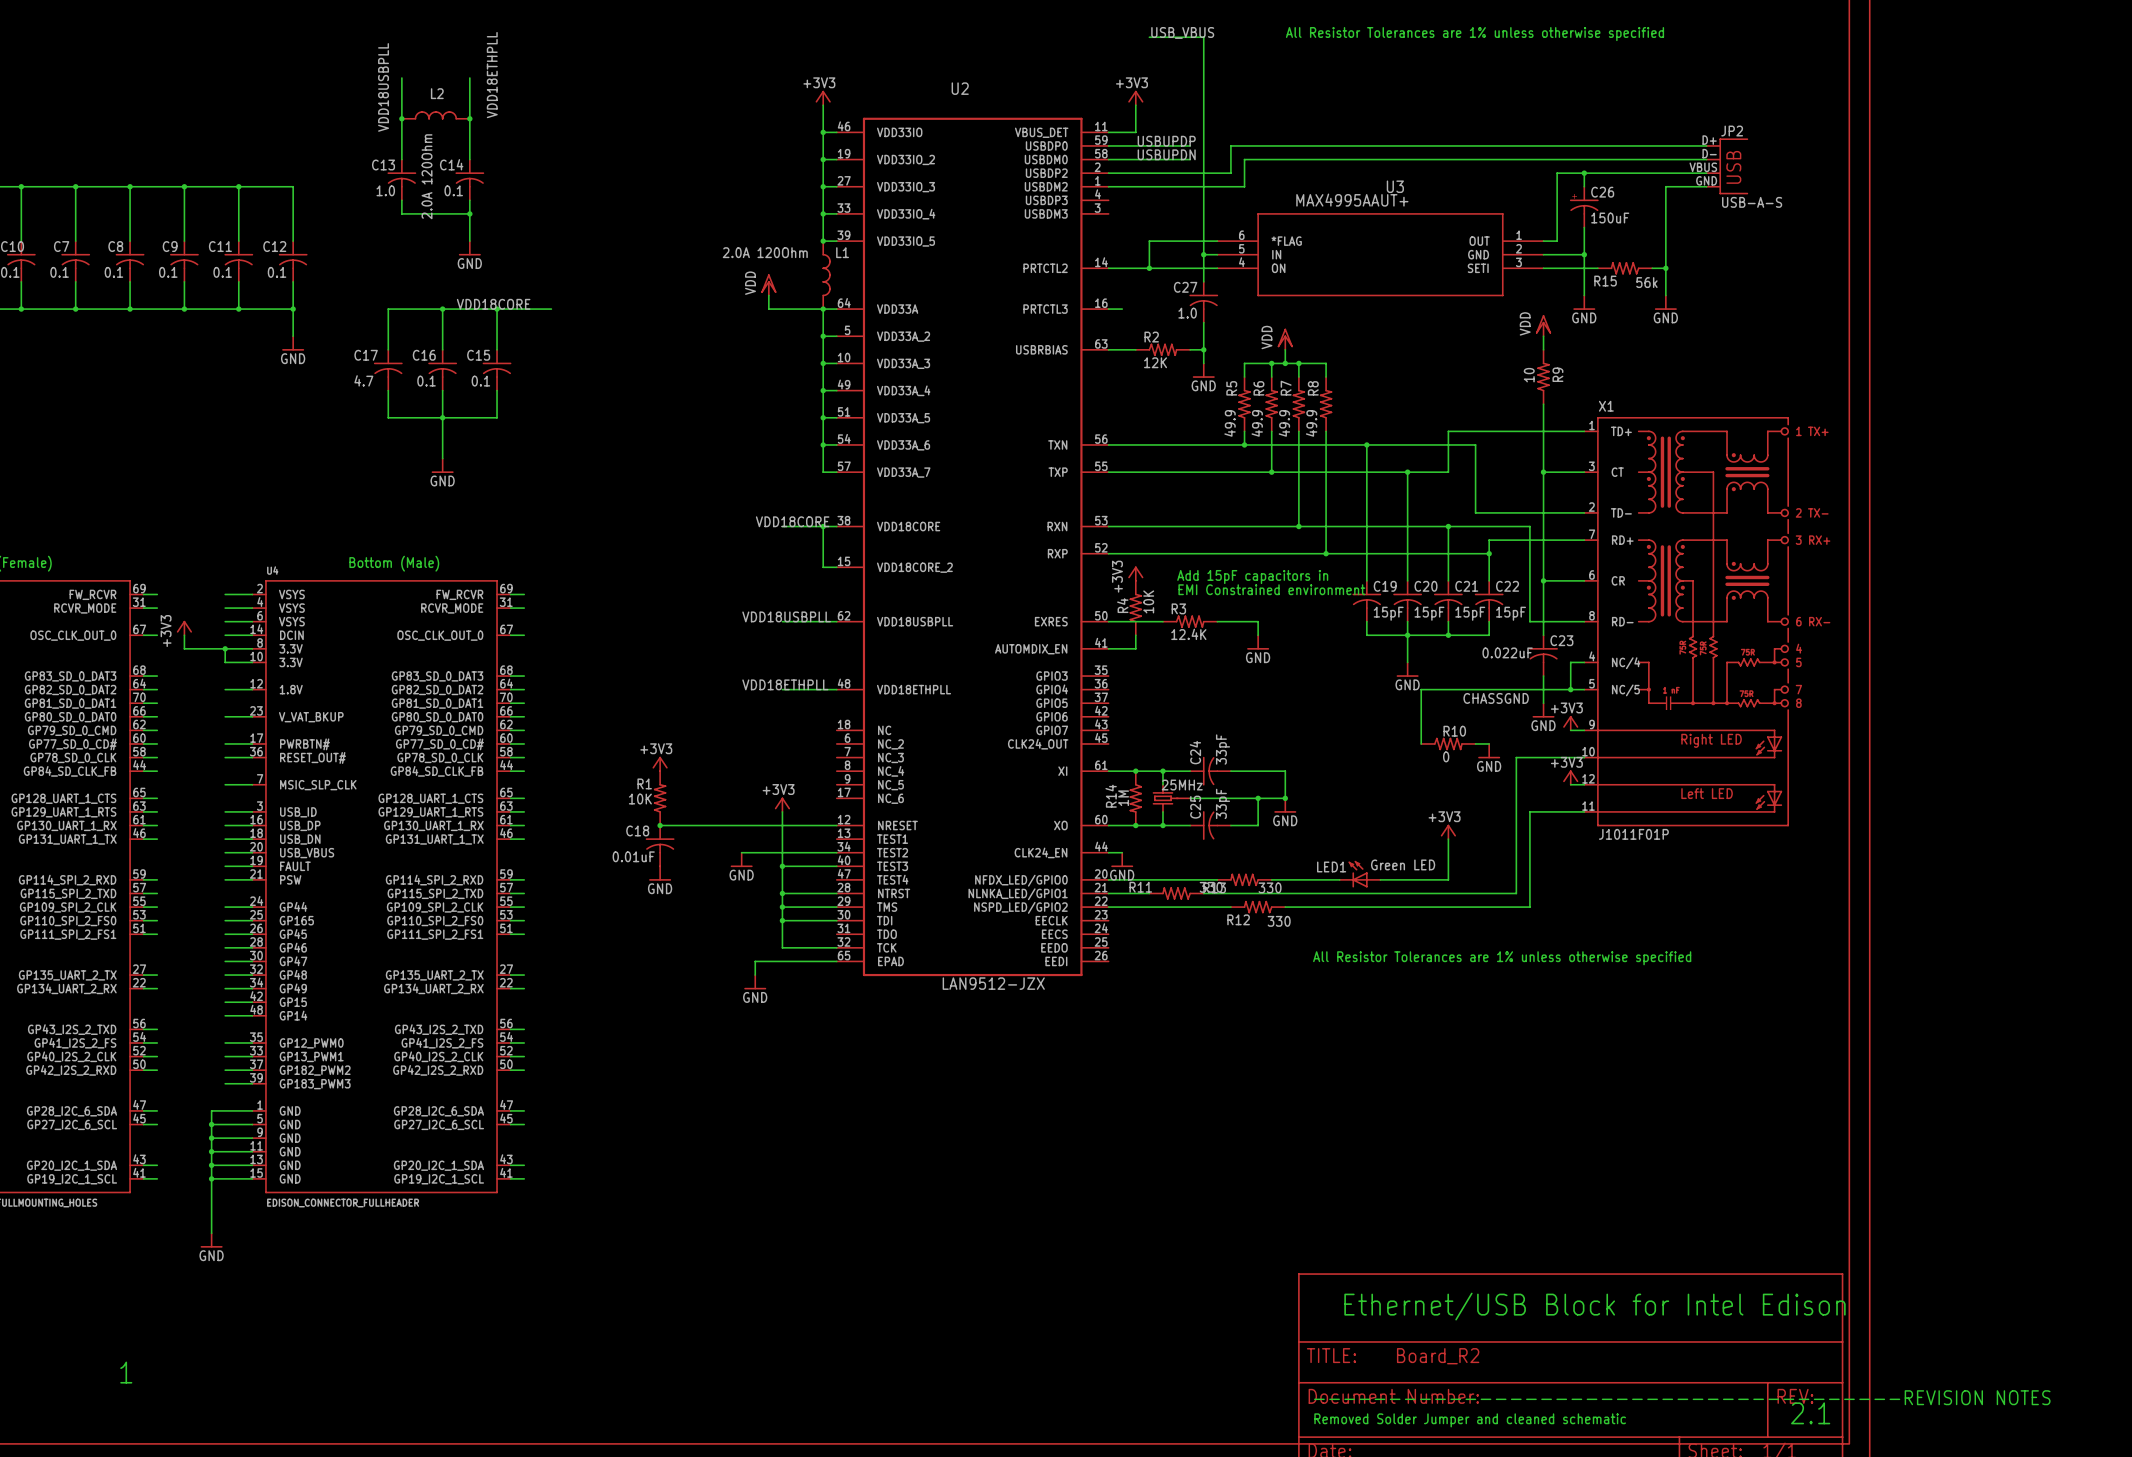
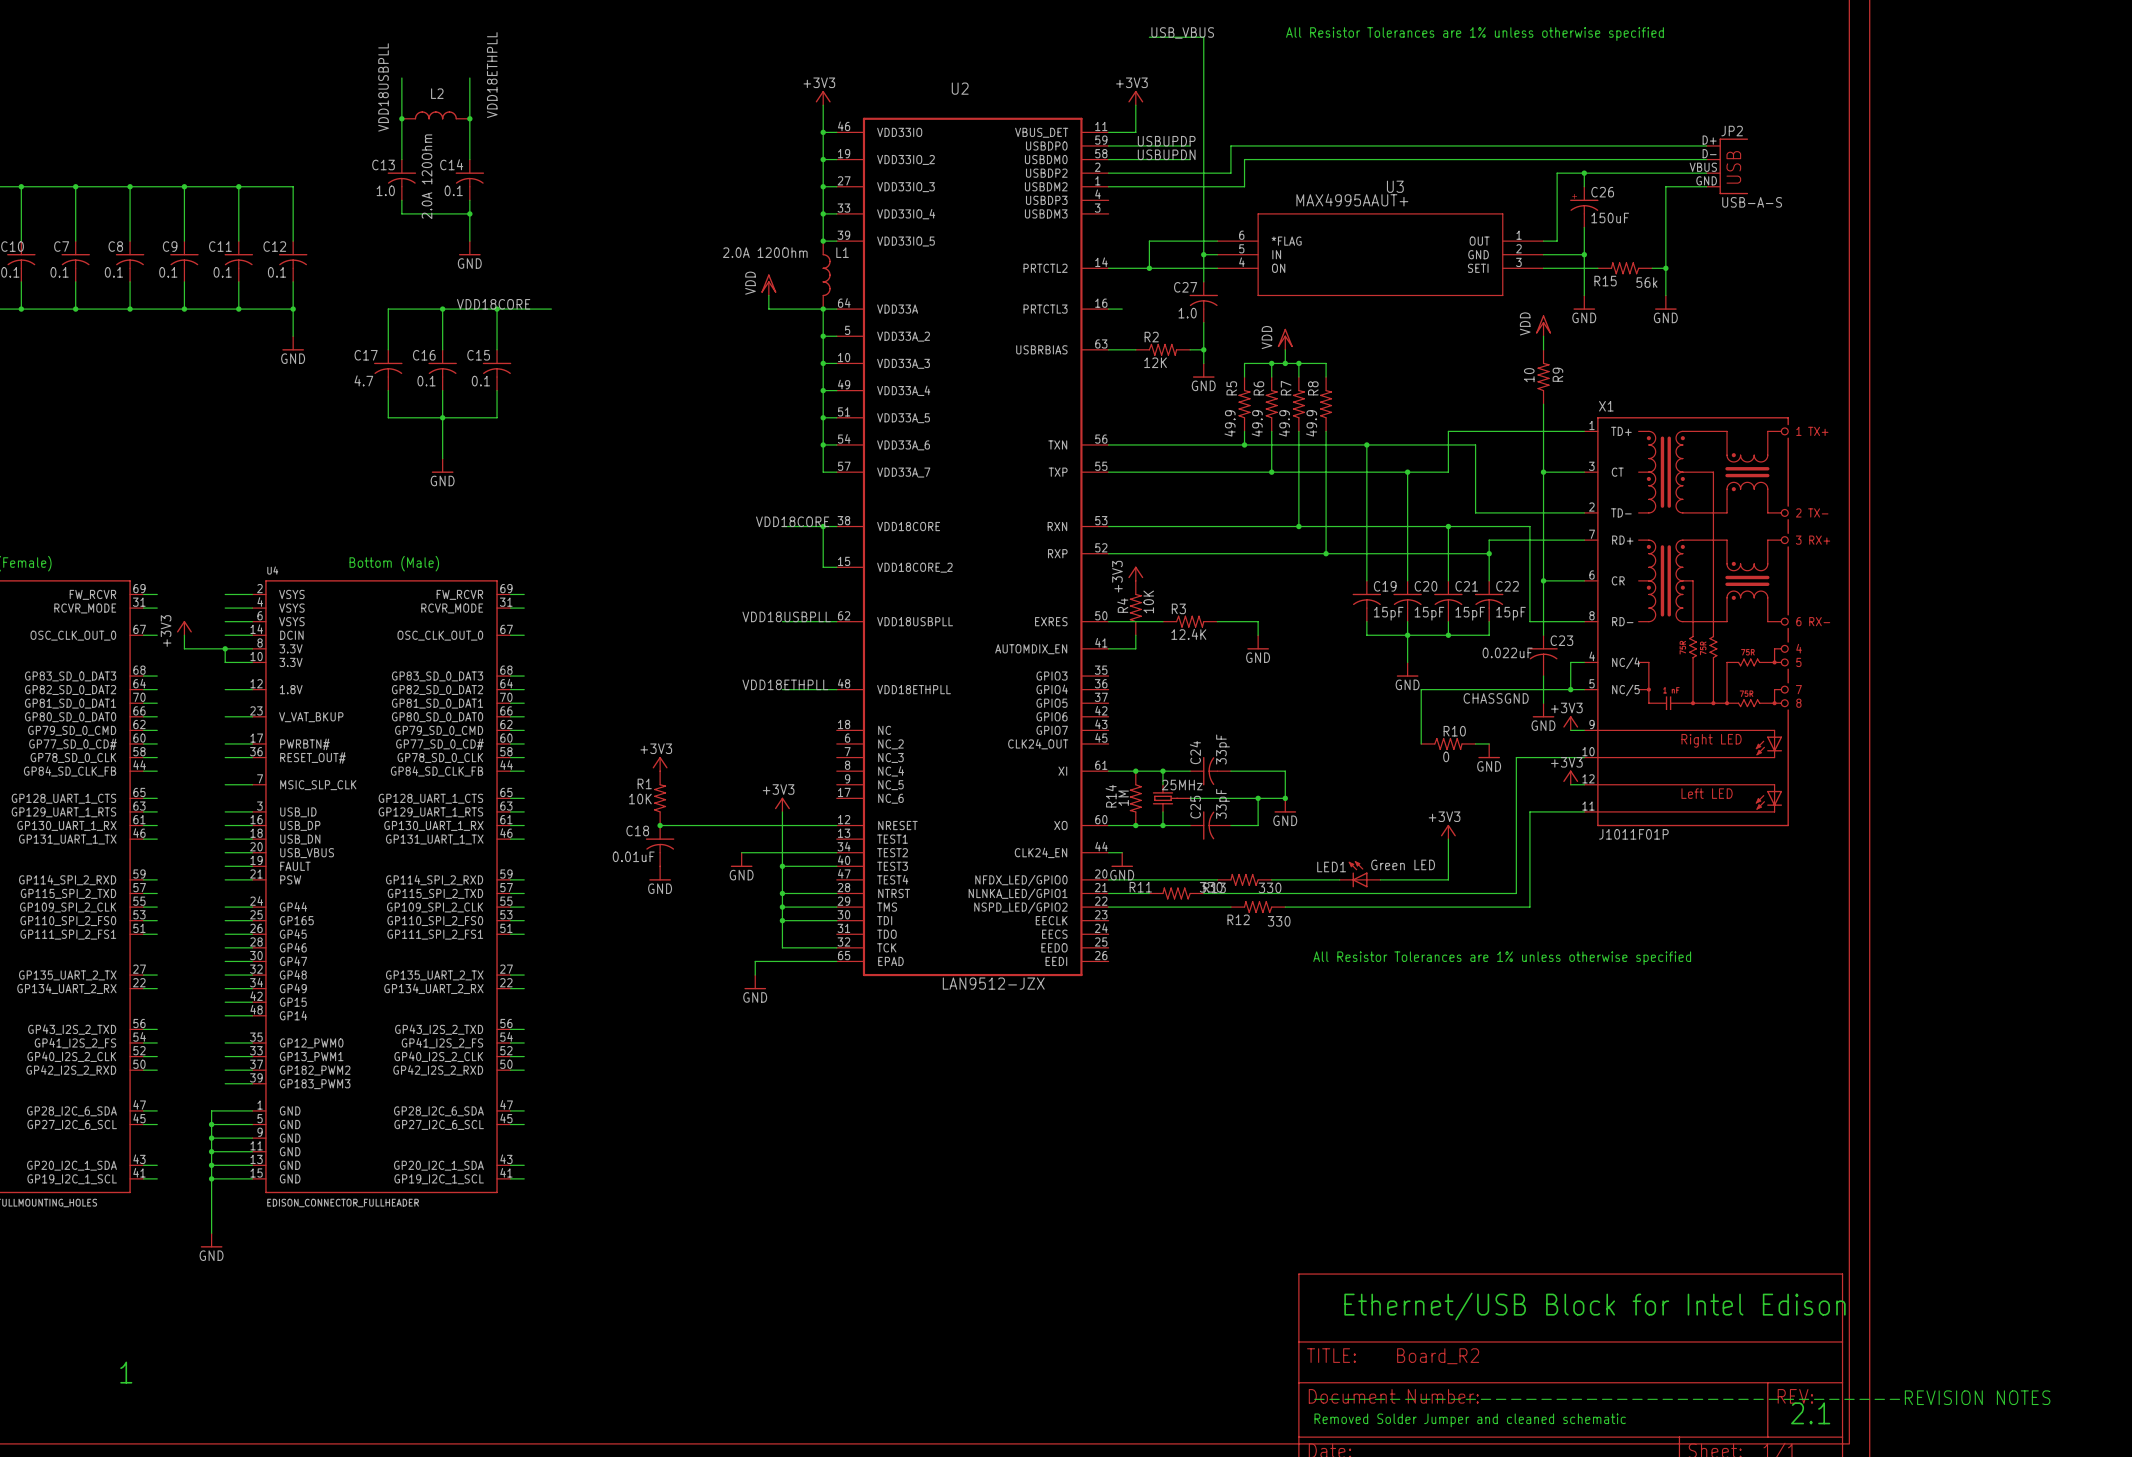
text: Add 15pF capacitors in (1252, 577) -> none
text: EMI Constrained environment (1271, 589) -> none

